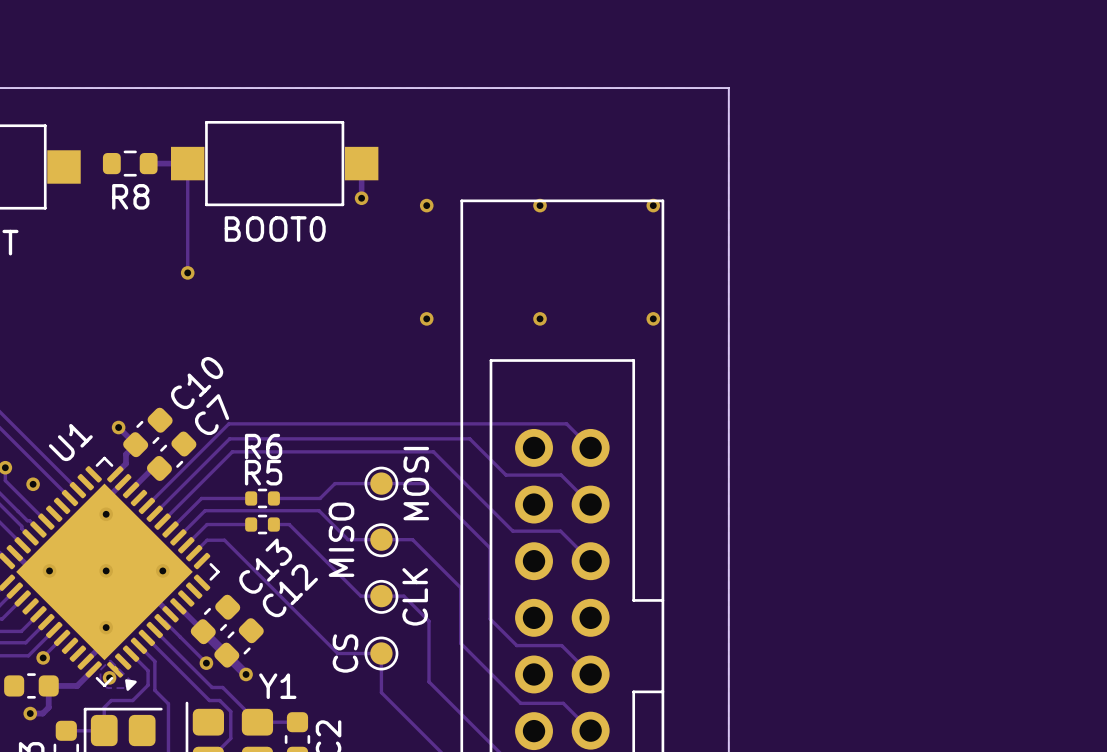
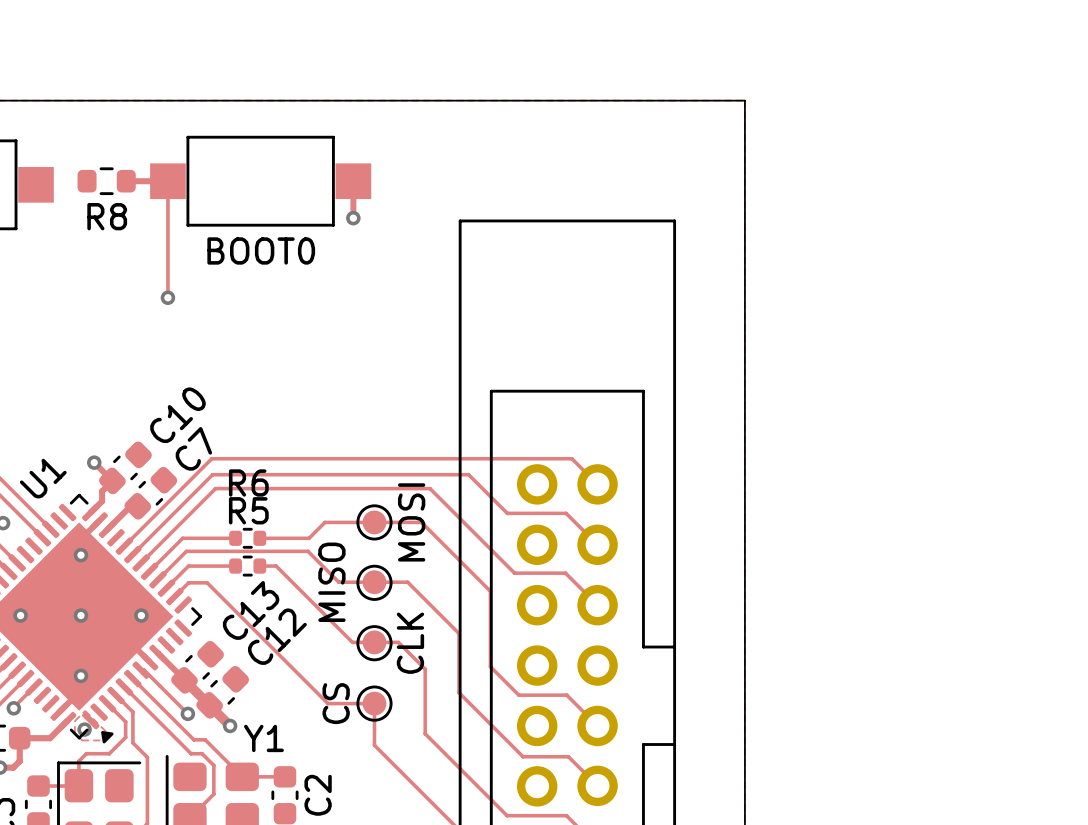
via: (426, 205) -> none
via: (540, 205) -> none
via: (653, 205) -> none
via: (426, 318) -> none
via: (540, 318) -> none
via: (653, 318) -> none

